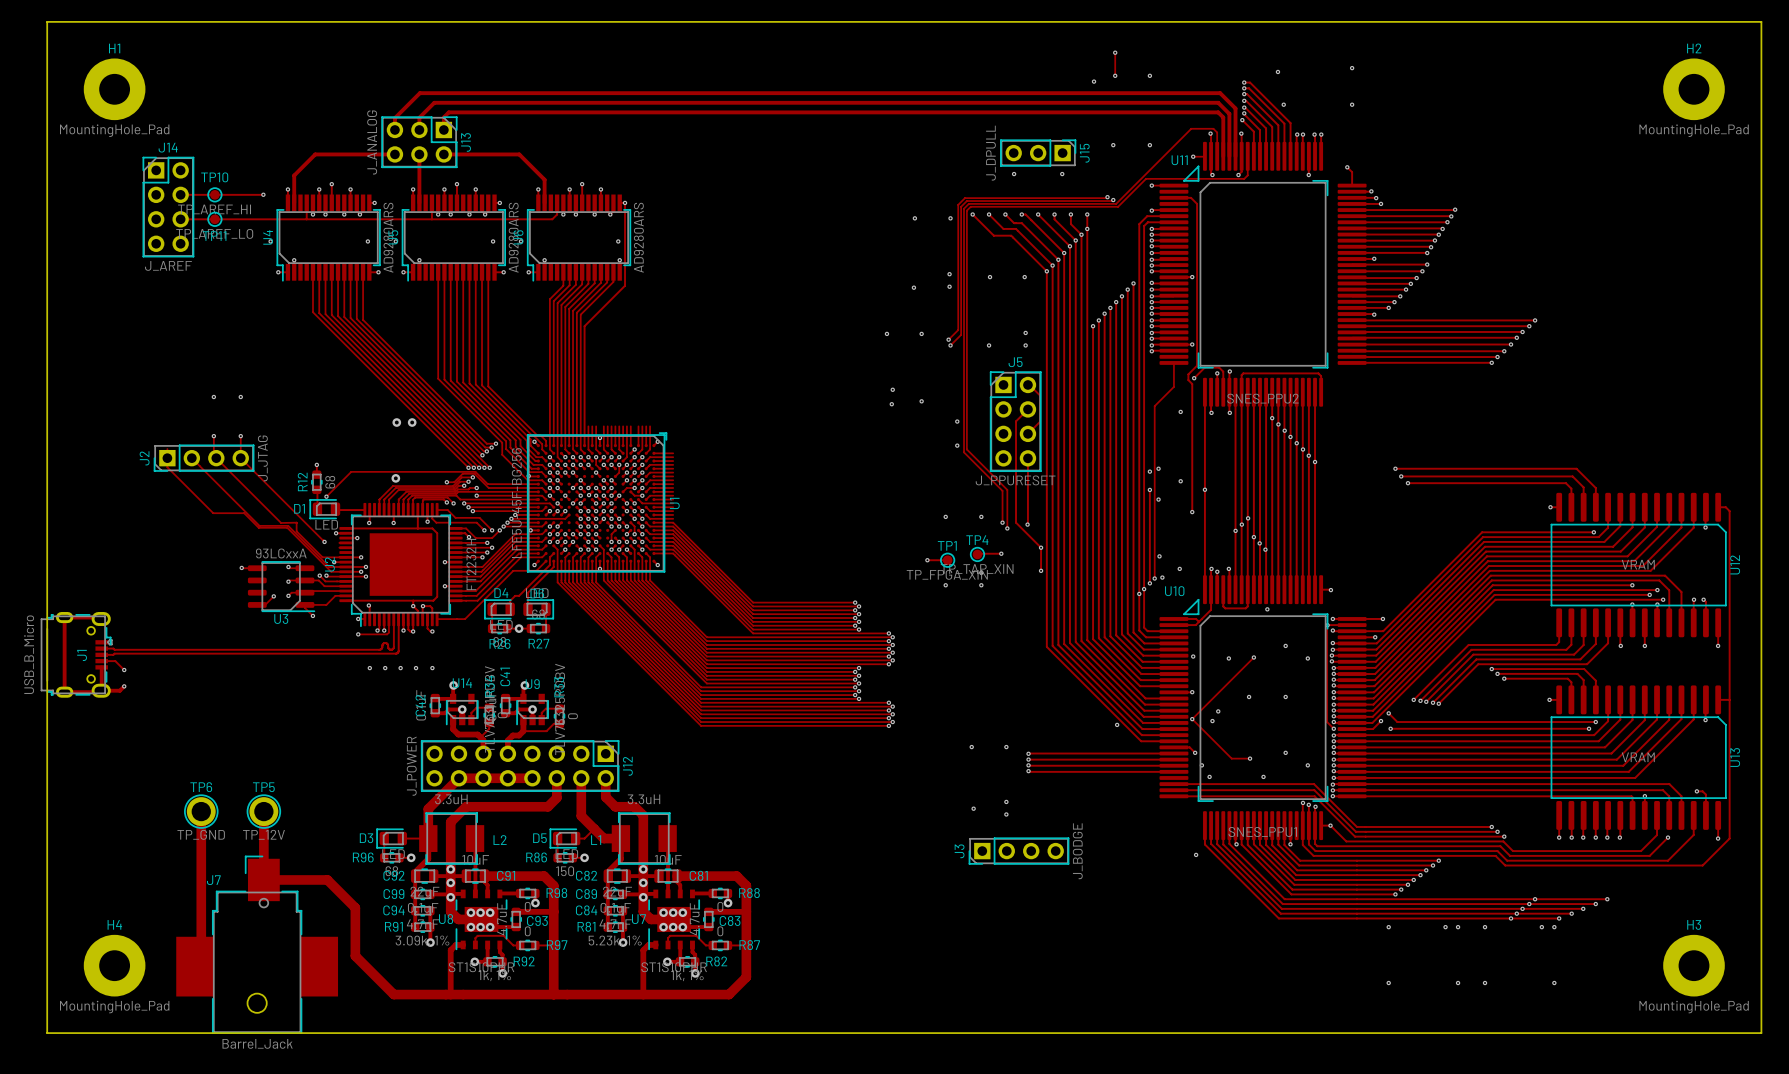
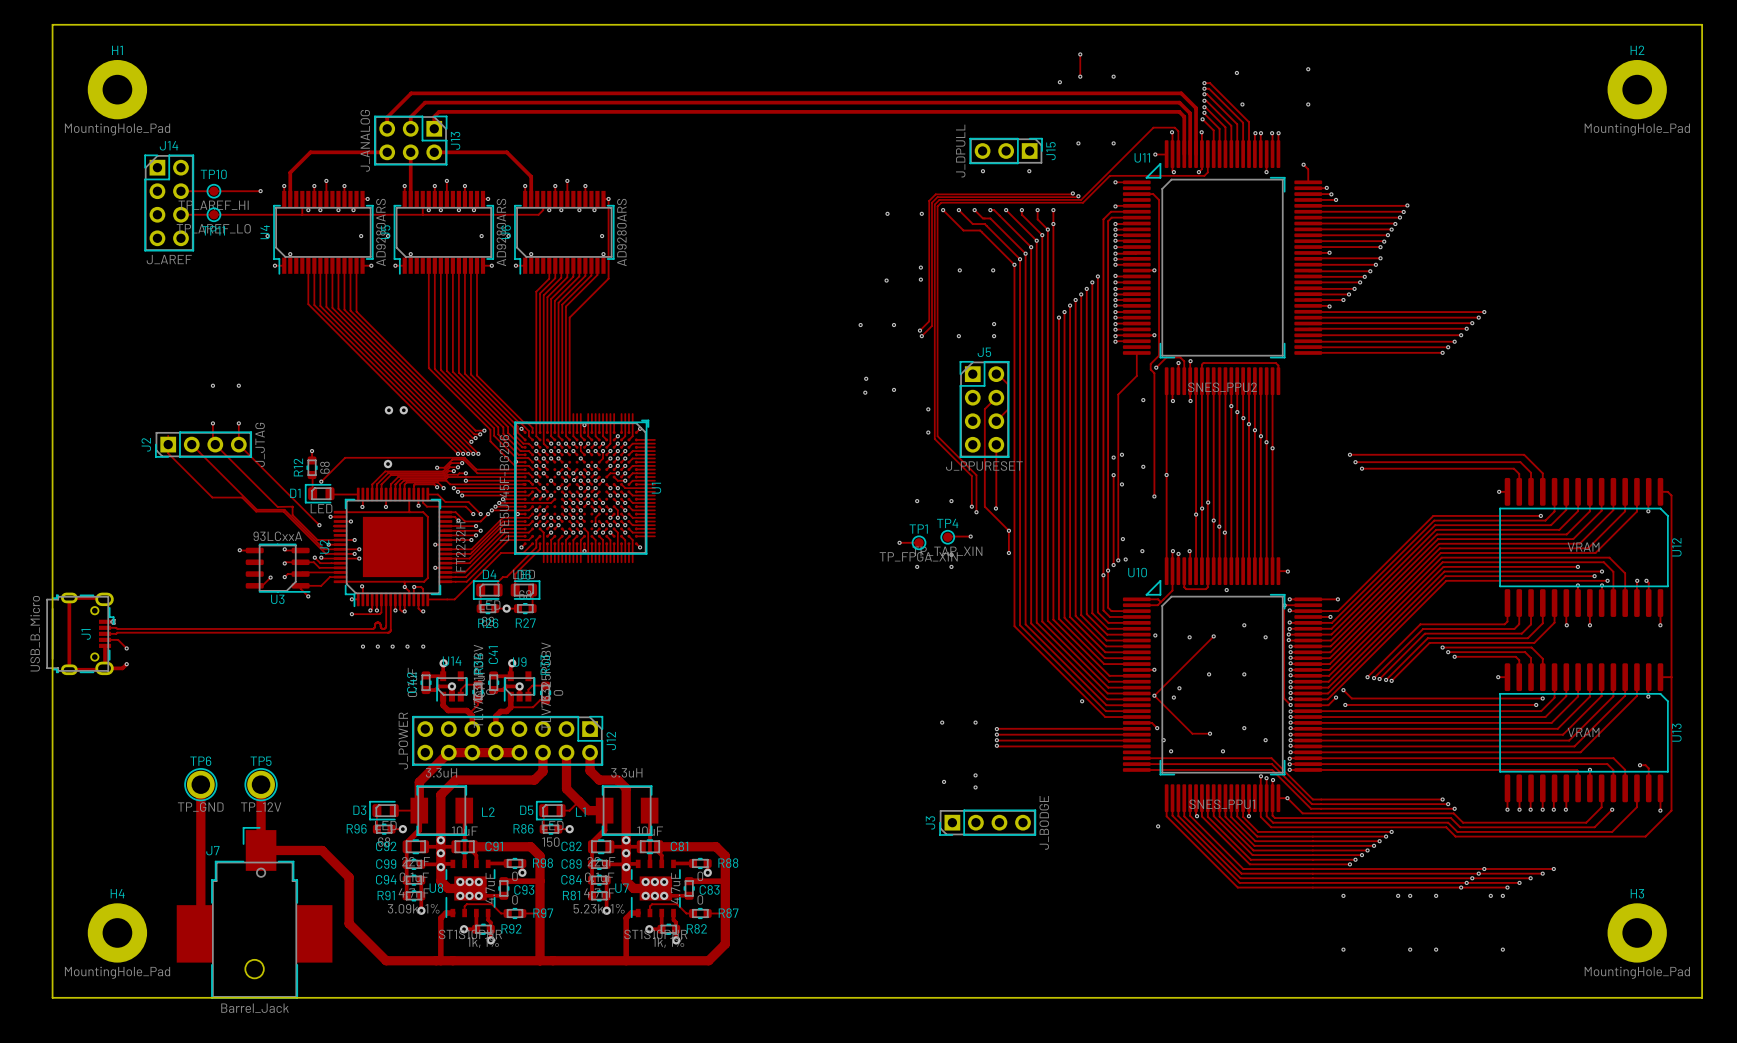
track: (673, 522) (753, 602) (855, 602) -> none
track: (673, 526) (753, 606) (859, 606) -> none
track: (673, 530) (753, 610) (855, 610) -> none
track: (673, 534) (753, 614) (859, 614) -> none
track: (673, 538) (753, 618) (855, 618) -> none
track: (673, 541) (753, 621) (859, 621) -> none
track: (673, 545) (753, 625) (855, 625) -> none
track: (673, 549) (753, 629) (859, 629) -> none
track: (673, 553) (753, 633) (888, 633) -> none
track: (557, 580) (701, 725) (888, 725) -> none
track: (561, 580) (701, 722) (892, 722) -> none
track: (565, 580) (701, 718) (888, 718) -> none
track: (569, 580) (701, 714) (892, 714) -> none
track: (573, 580) (701, 710) (888, 710) -> none
track: (576, 580) (701, 706) (892, 706) -> none
track: (580, 580) (701, 702) (888, 702) -> none
track: (584, 580) (701, 698) (859, 698) -> none
track: (588, 580) (701, 695) (855, 695) -> none
track: (592, 580) (701, 691) (859, 691) -> none
track: (596, 580) (701, 687) (855, 687) -> none
track: (603, 580) (706, 683) (859, 683) -> none
track: (607, 580) (706, 679) (855, 679) -> none
track: (611, 580) (706, 675) (859, 675) -> none
track: (615, 580) (706, 671) (855, 671) -> none
track: (619, 580) (706, 668) (859, 668) -> none
track: (623, 580) (706, 664) (888, 664) -> none
track: (626, 580) (706, 660) (892, 660) -> none
track: (630, 580) (706, 656) (888, 656) -> none
track: (634, 580) (706, 652) (892, 652) -> none
track: (638, 580) (706, 648) (888, 648) -> none
track: (642, 580) (706, 644) (892, 644) -> none
track: (646, 580) (706, 641) (888, 641) -> none
track: (650, 580) (706, 637) (892, 637) -> none
via: (855, 602) -> none
via: (859, 606) -> none
via: (855, 610) -> none
via: (859, 614) -> none
via: (855, 618) -> none
via: (859, 621) -> none
via: (855, 625) -> none
via: (859, 629) -> none
via: (888, 633) -> none
via: (892, 637) -> none
via: (888, 641) -> none
via: (892, 644) -> none
via: (888, 648) -> none
via: (892, 652) -> none
via: (888, 656) -> none
via: (892, 660) -> none
via: (888, 664) -> none
via: (859, 668) -> none
via: (855, 671) -> none
via: (859, 675) -> none
via: (855, 679) -> none
via: (859, 683) -> none
via: (855, 687) -> none
via: (859, 691) -> none
via: (855, 695) -> none
via: (859, 698) -> none
via: (888, 702) -> none
via: (892, 706) -> none
via: (888, 710) -> none
via: (892, 714) -> none
via: (888, 718) -> none
via: (892, 722) -> none
via: (888, 725) -> none

